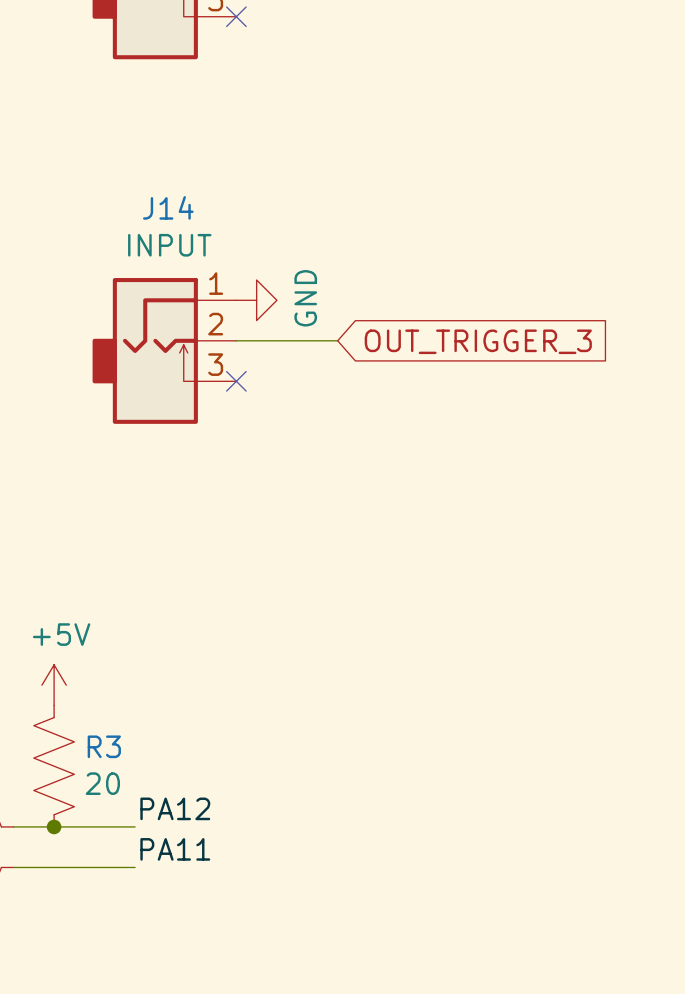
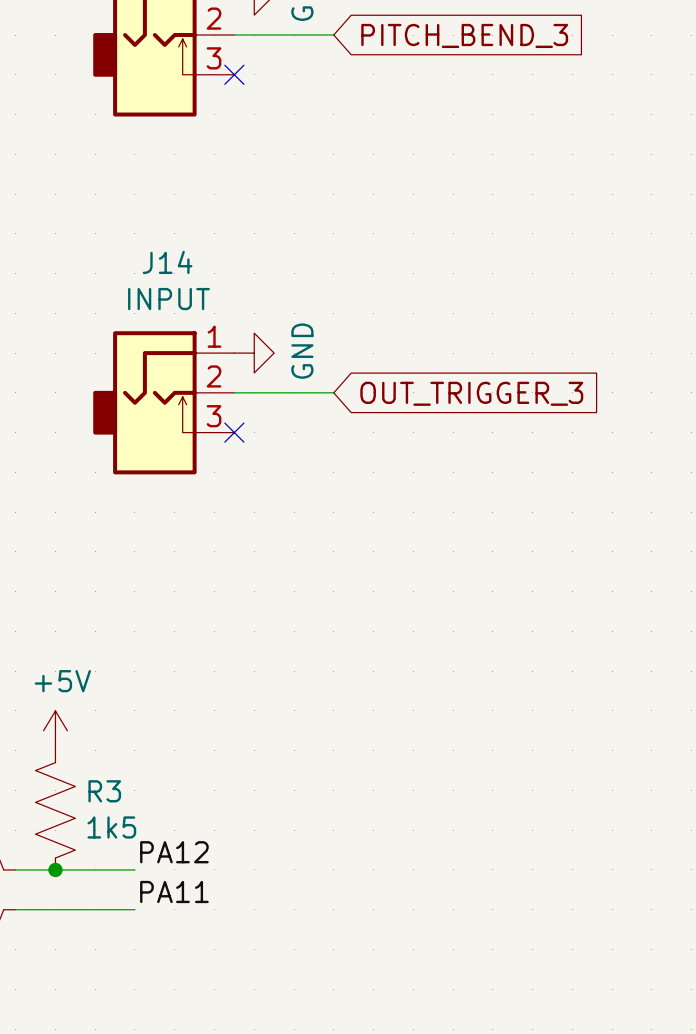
R3 value: 20 (102, 783) -> 1k5 (111, 827)

